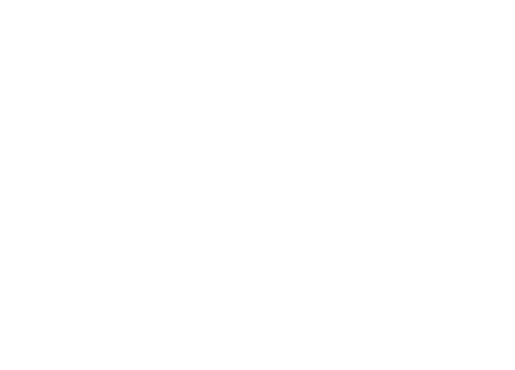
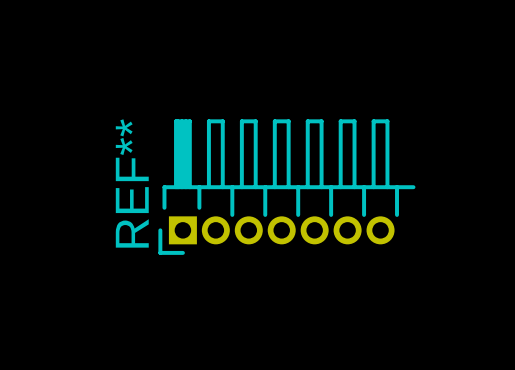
REF**: none -> (286, 187)

